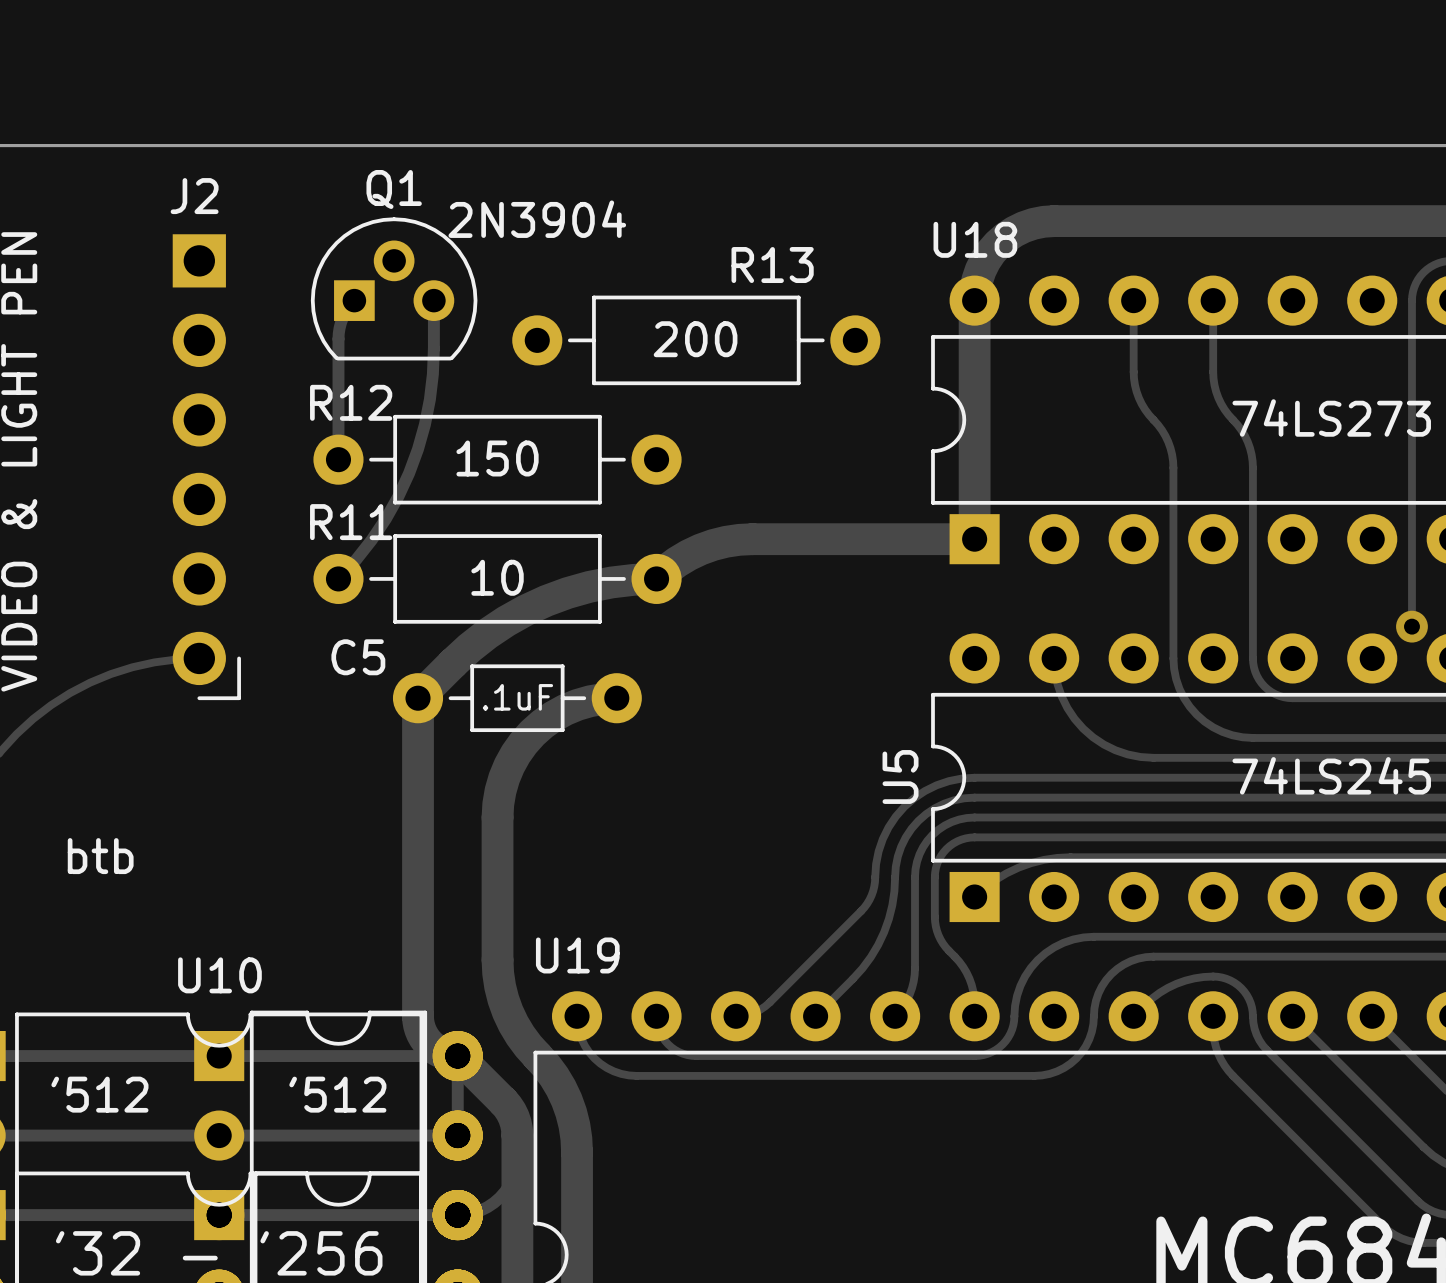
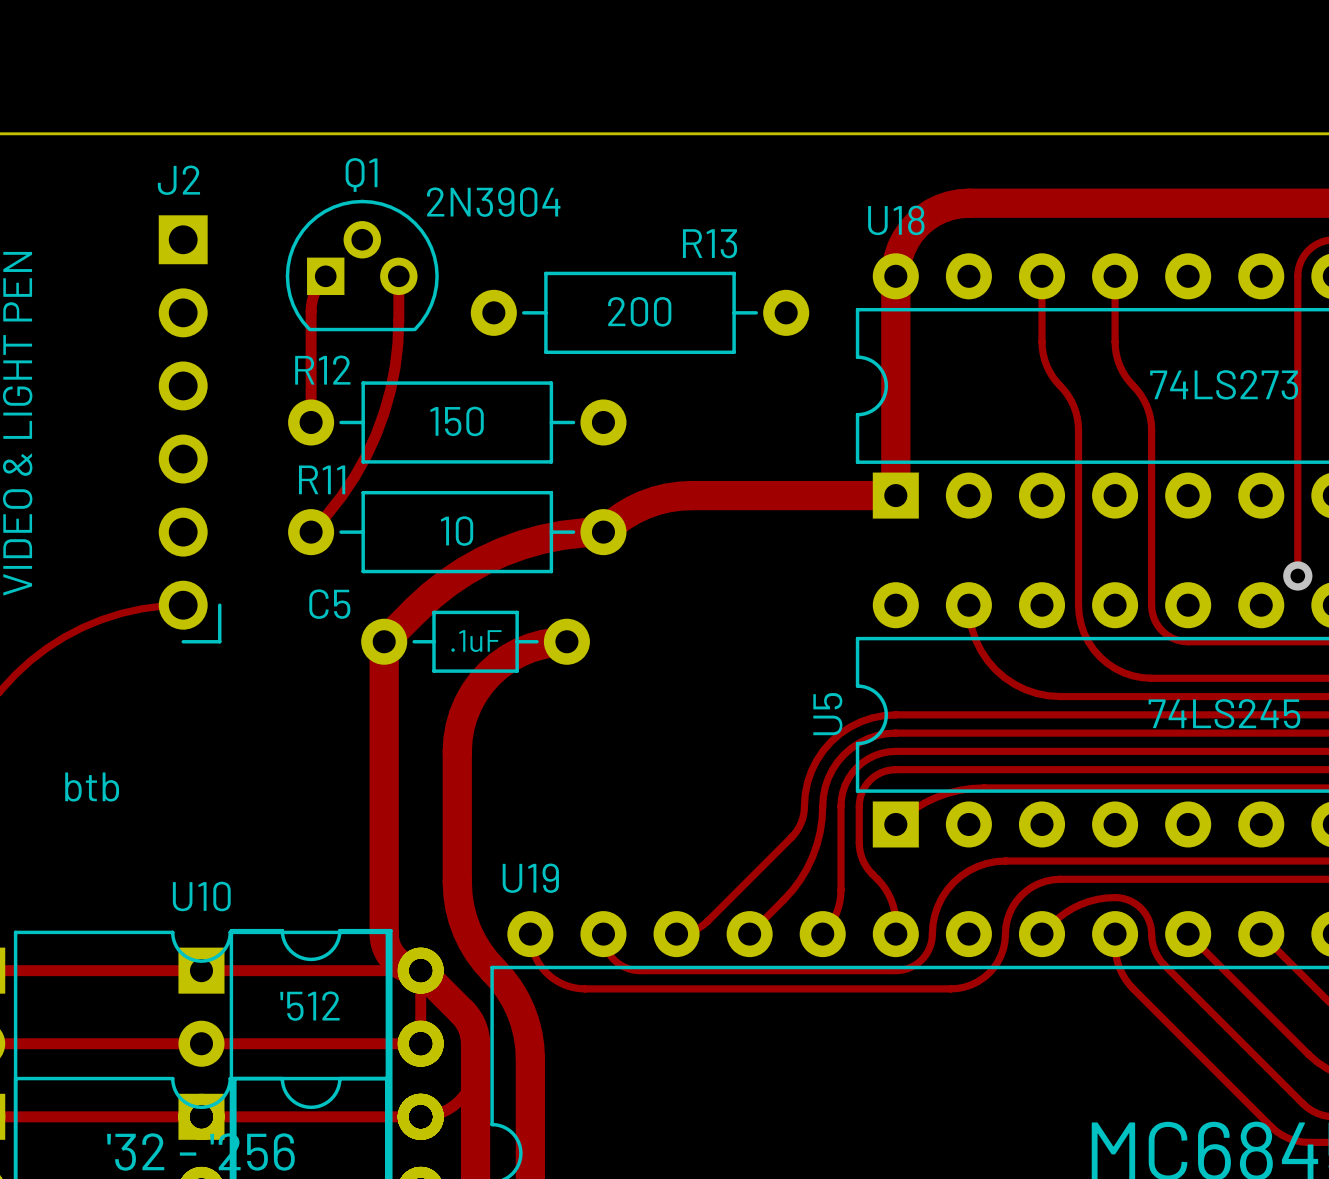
part value: '512 (99, 1094) -> none

